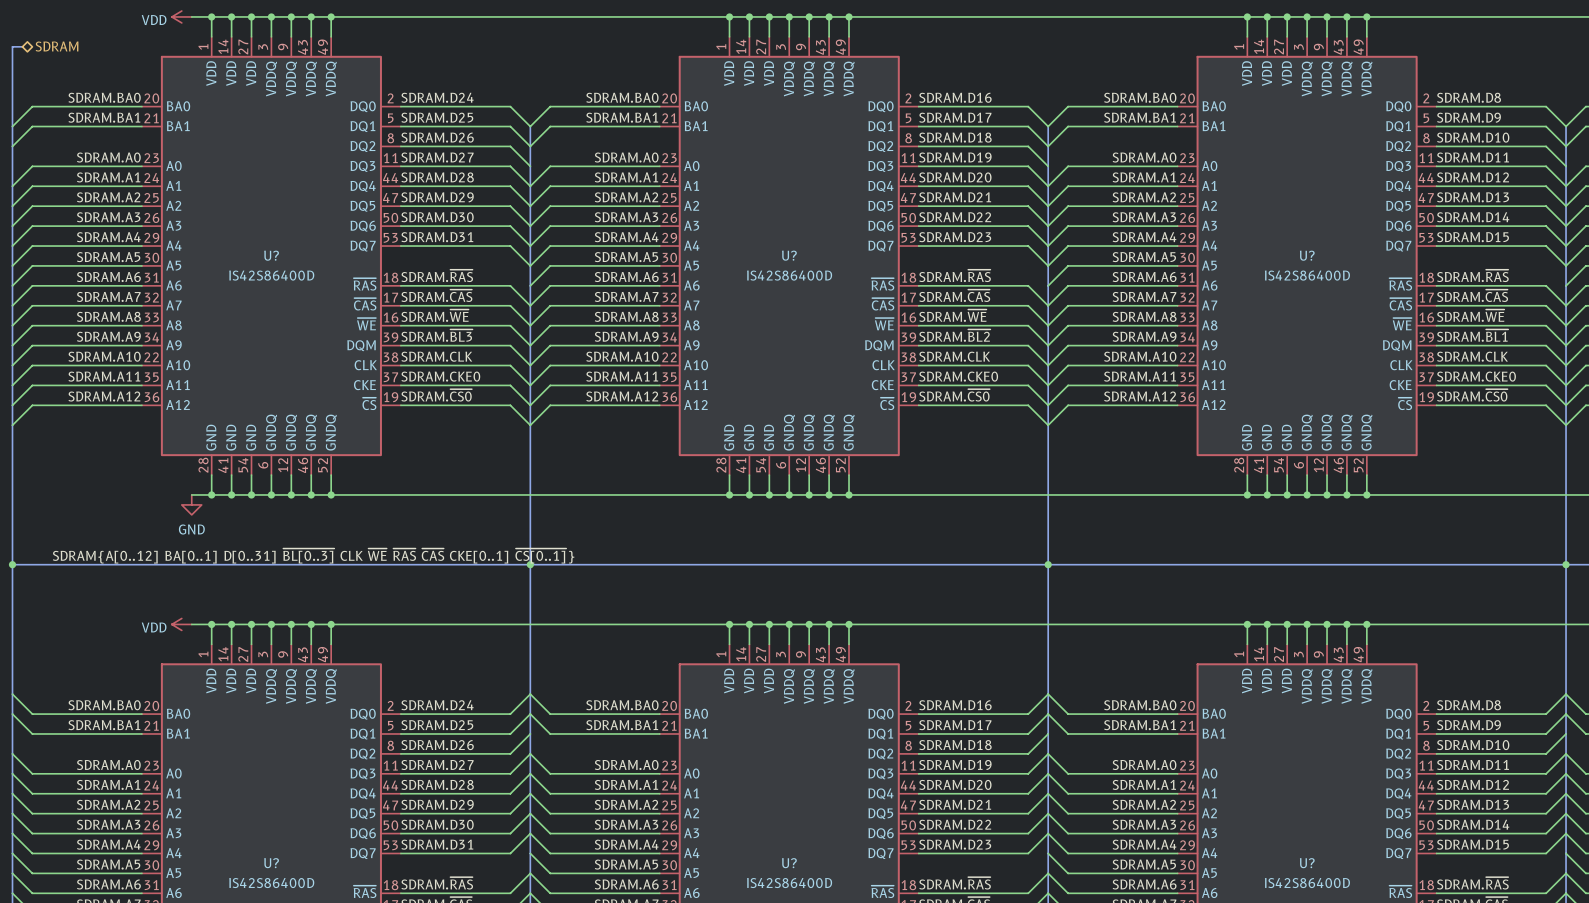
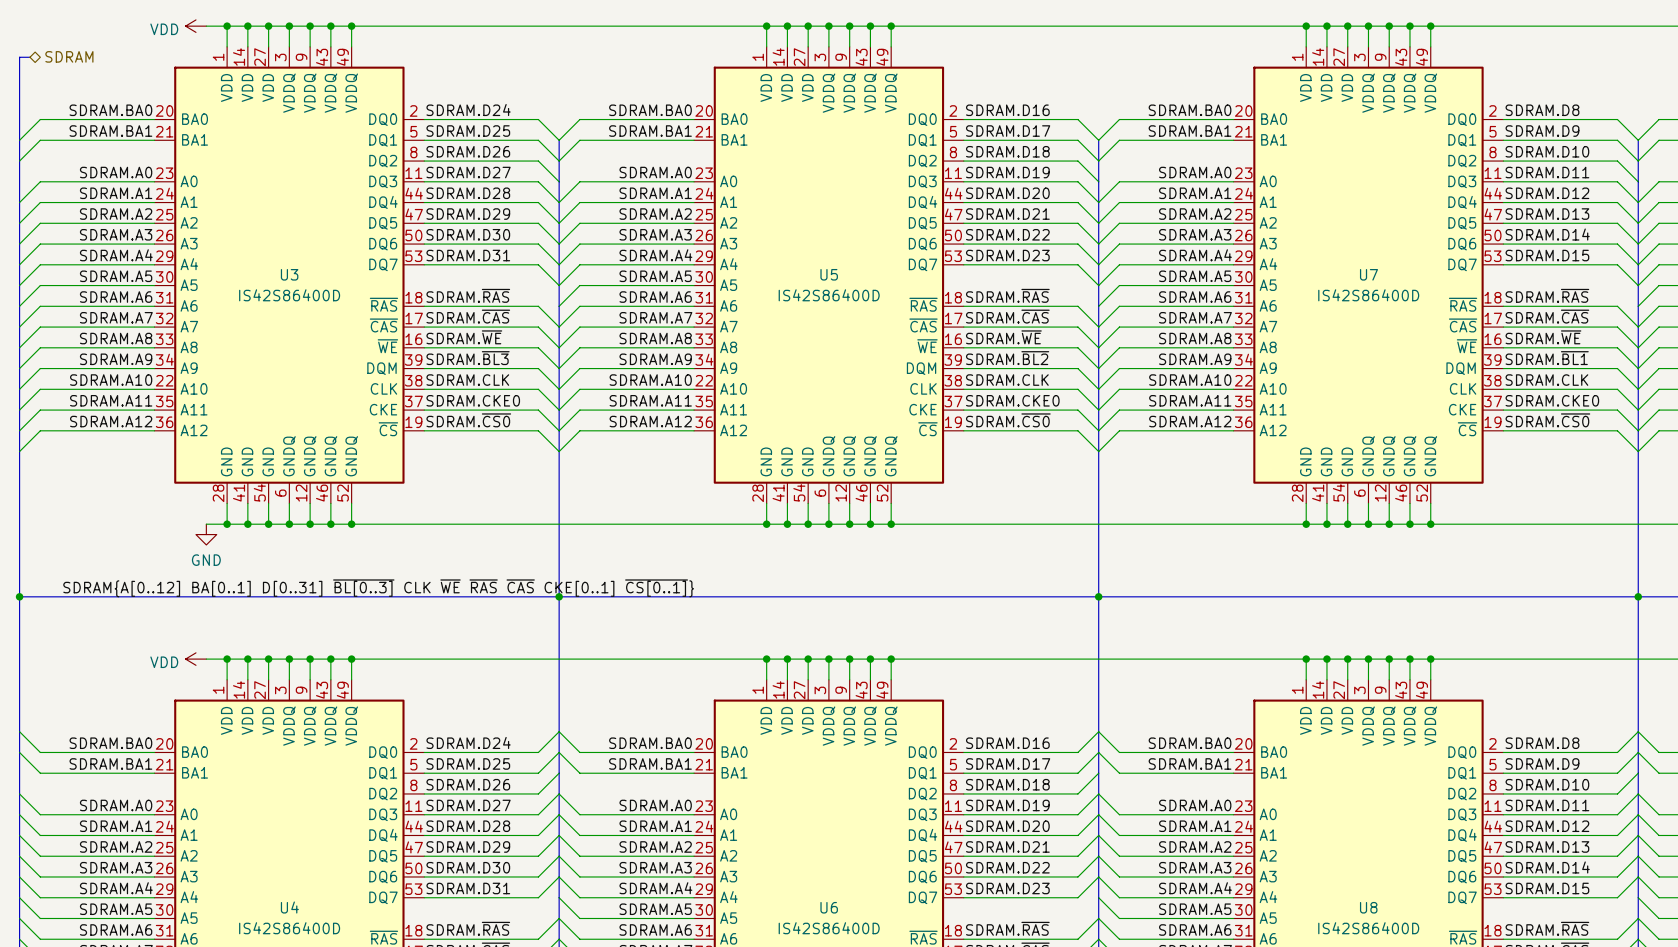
U? name: U? (271, 255) -> U3 (289, 274)
U? name: U? (789, 255) -> U5 (829, 274)
U? name: U? (1307, 255) -> U7 (1368, 274)
U? name: U? (271, 863) -> U4 (289, 907)
U? name: U? (789, 863) -> U6 (829, 907)
U? name: U? (1307, 863) -> U8 (1368, 907)

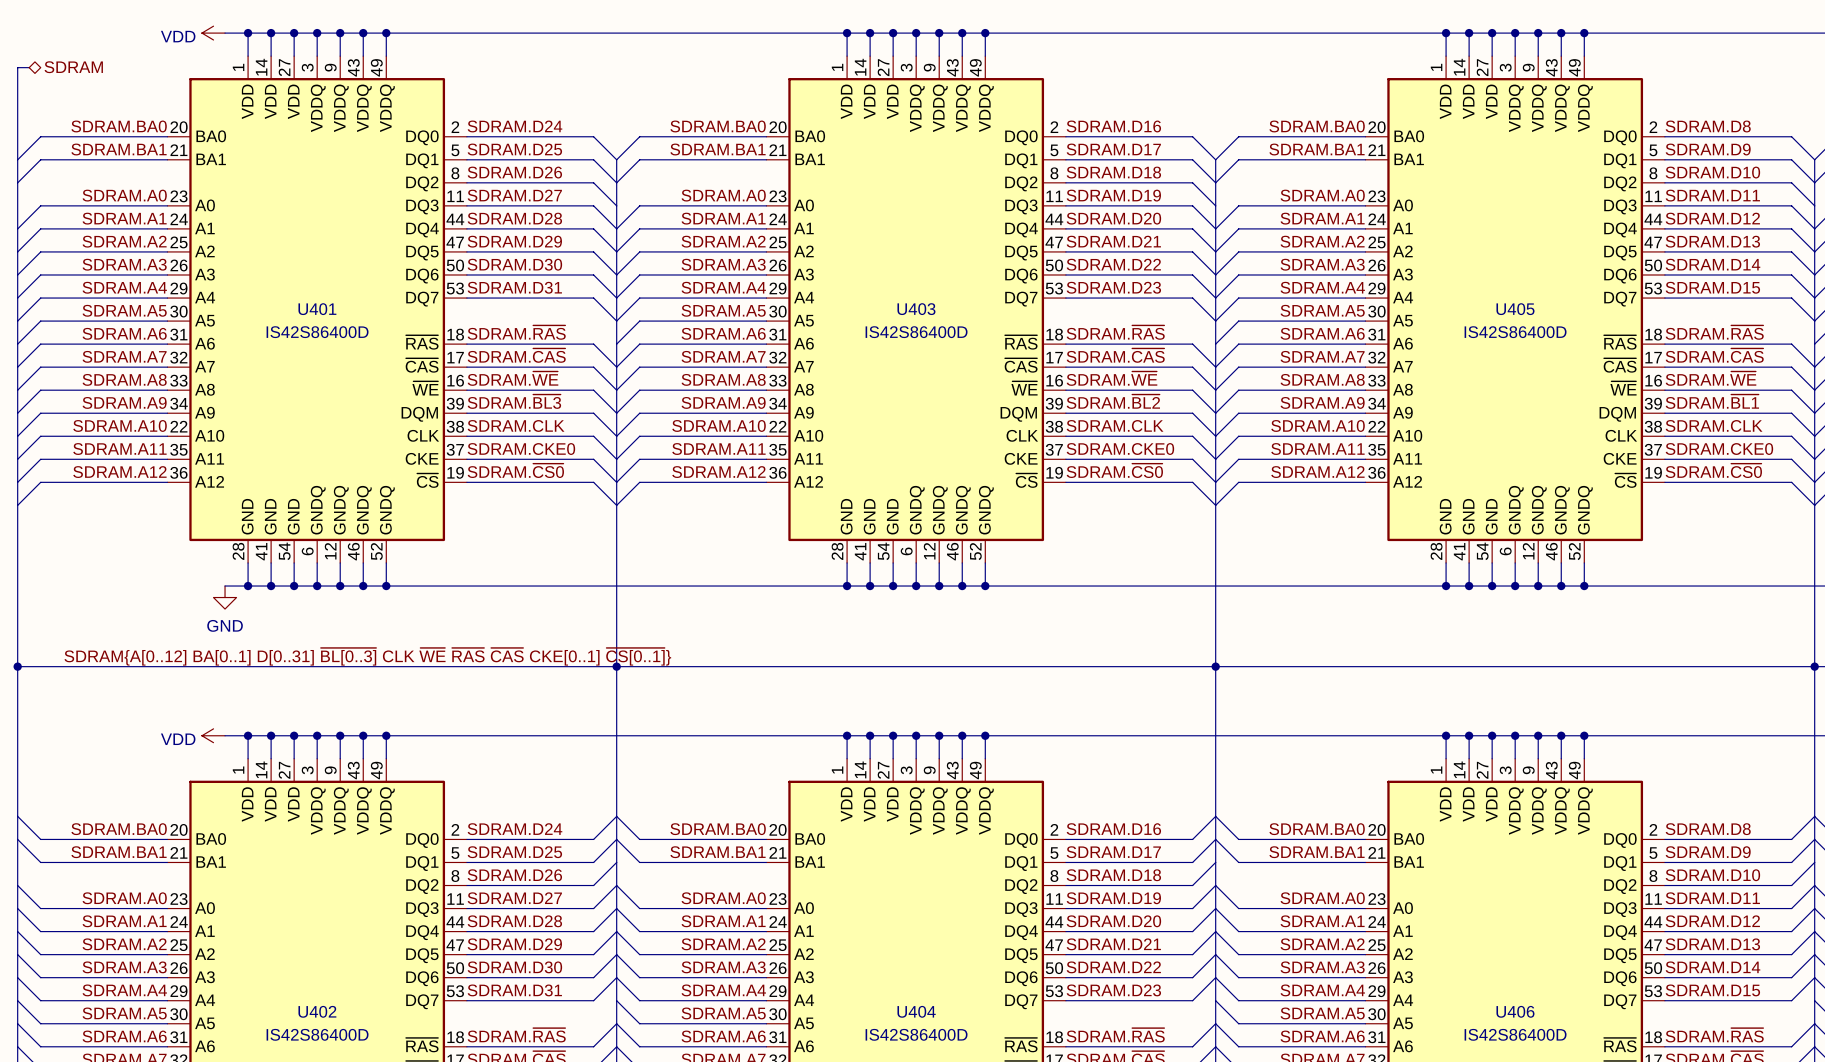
U3 name: U3 (289, 274) -> U401 (317, 309)
U5 name: U5 (829, 274) -> U403 (916, 309)
U7 name: U7 (1368, 274) -> U405 (1515, 309)
U4 name: U4 (289, 907) -> U402 (317, 1011)
U6 name: U6 (829, 907) -> U404 (916, 1011)
U8 name: U8 (1368, 907) -> U406 (1515, 1011)

